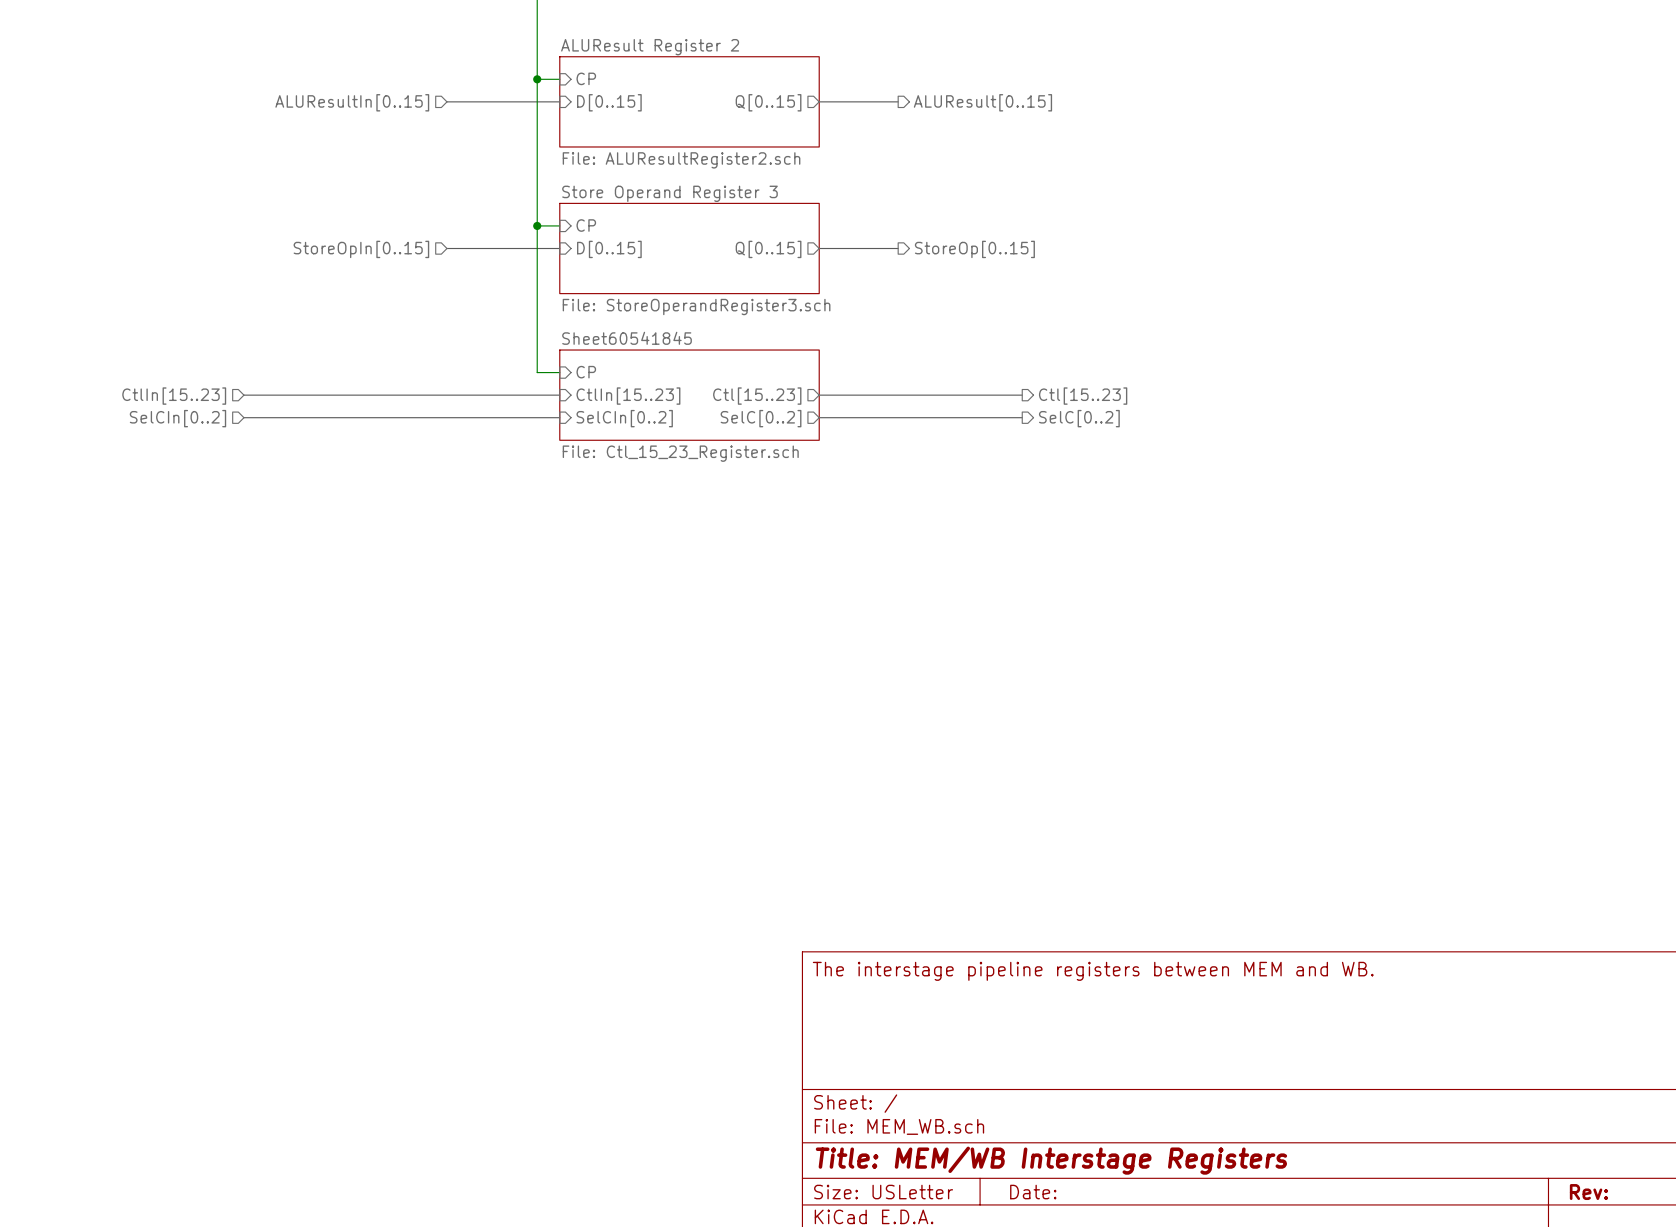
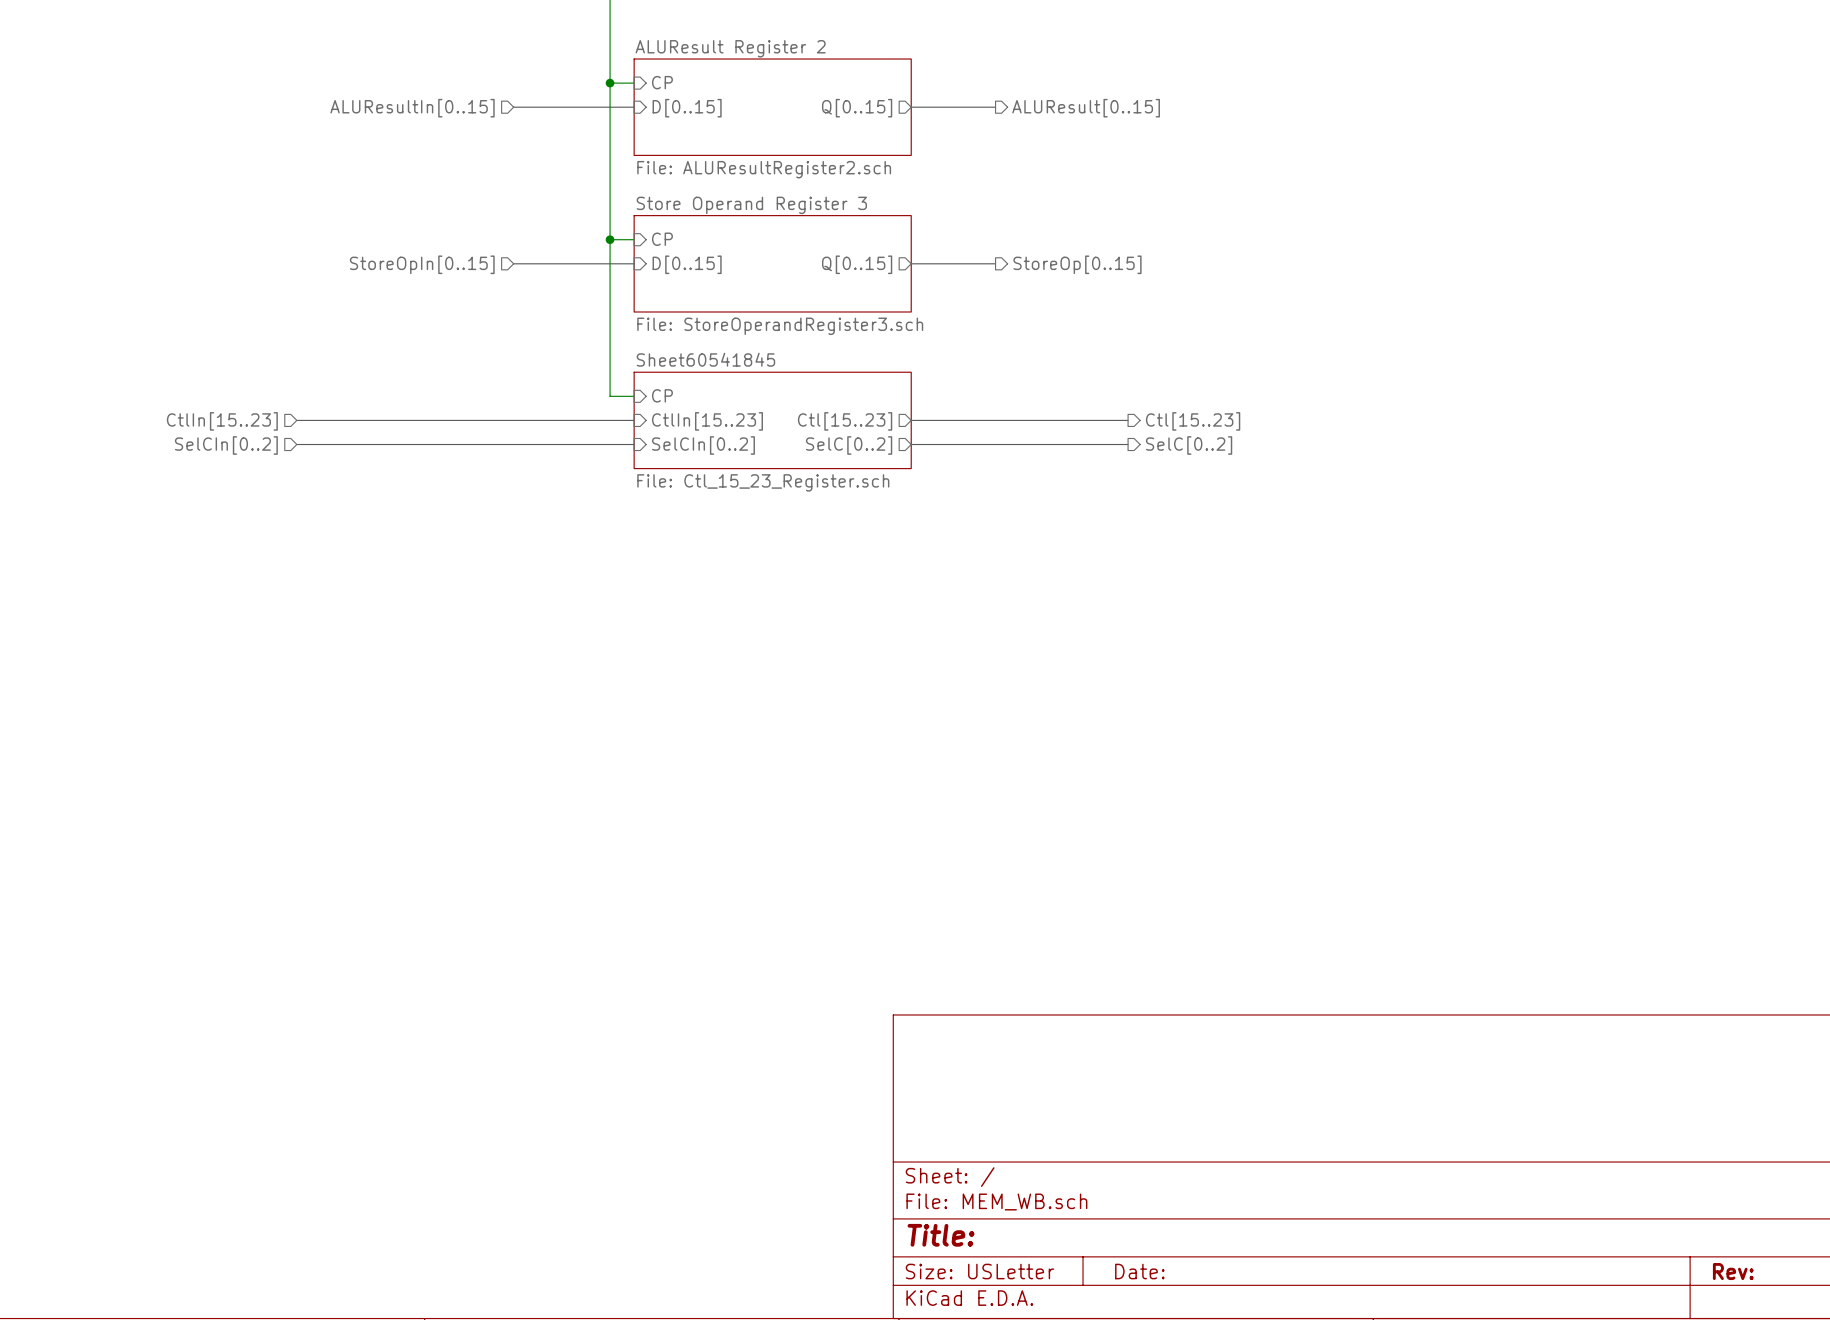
title block: The interstage pipeline registers between MEM and WB. (1093, 971) -> none
title block: Title: MEM/WB Interstage Registers (1051, 1160) -> Title: (941, 1235)

